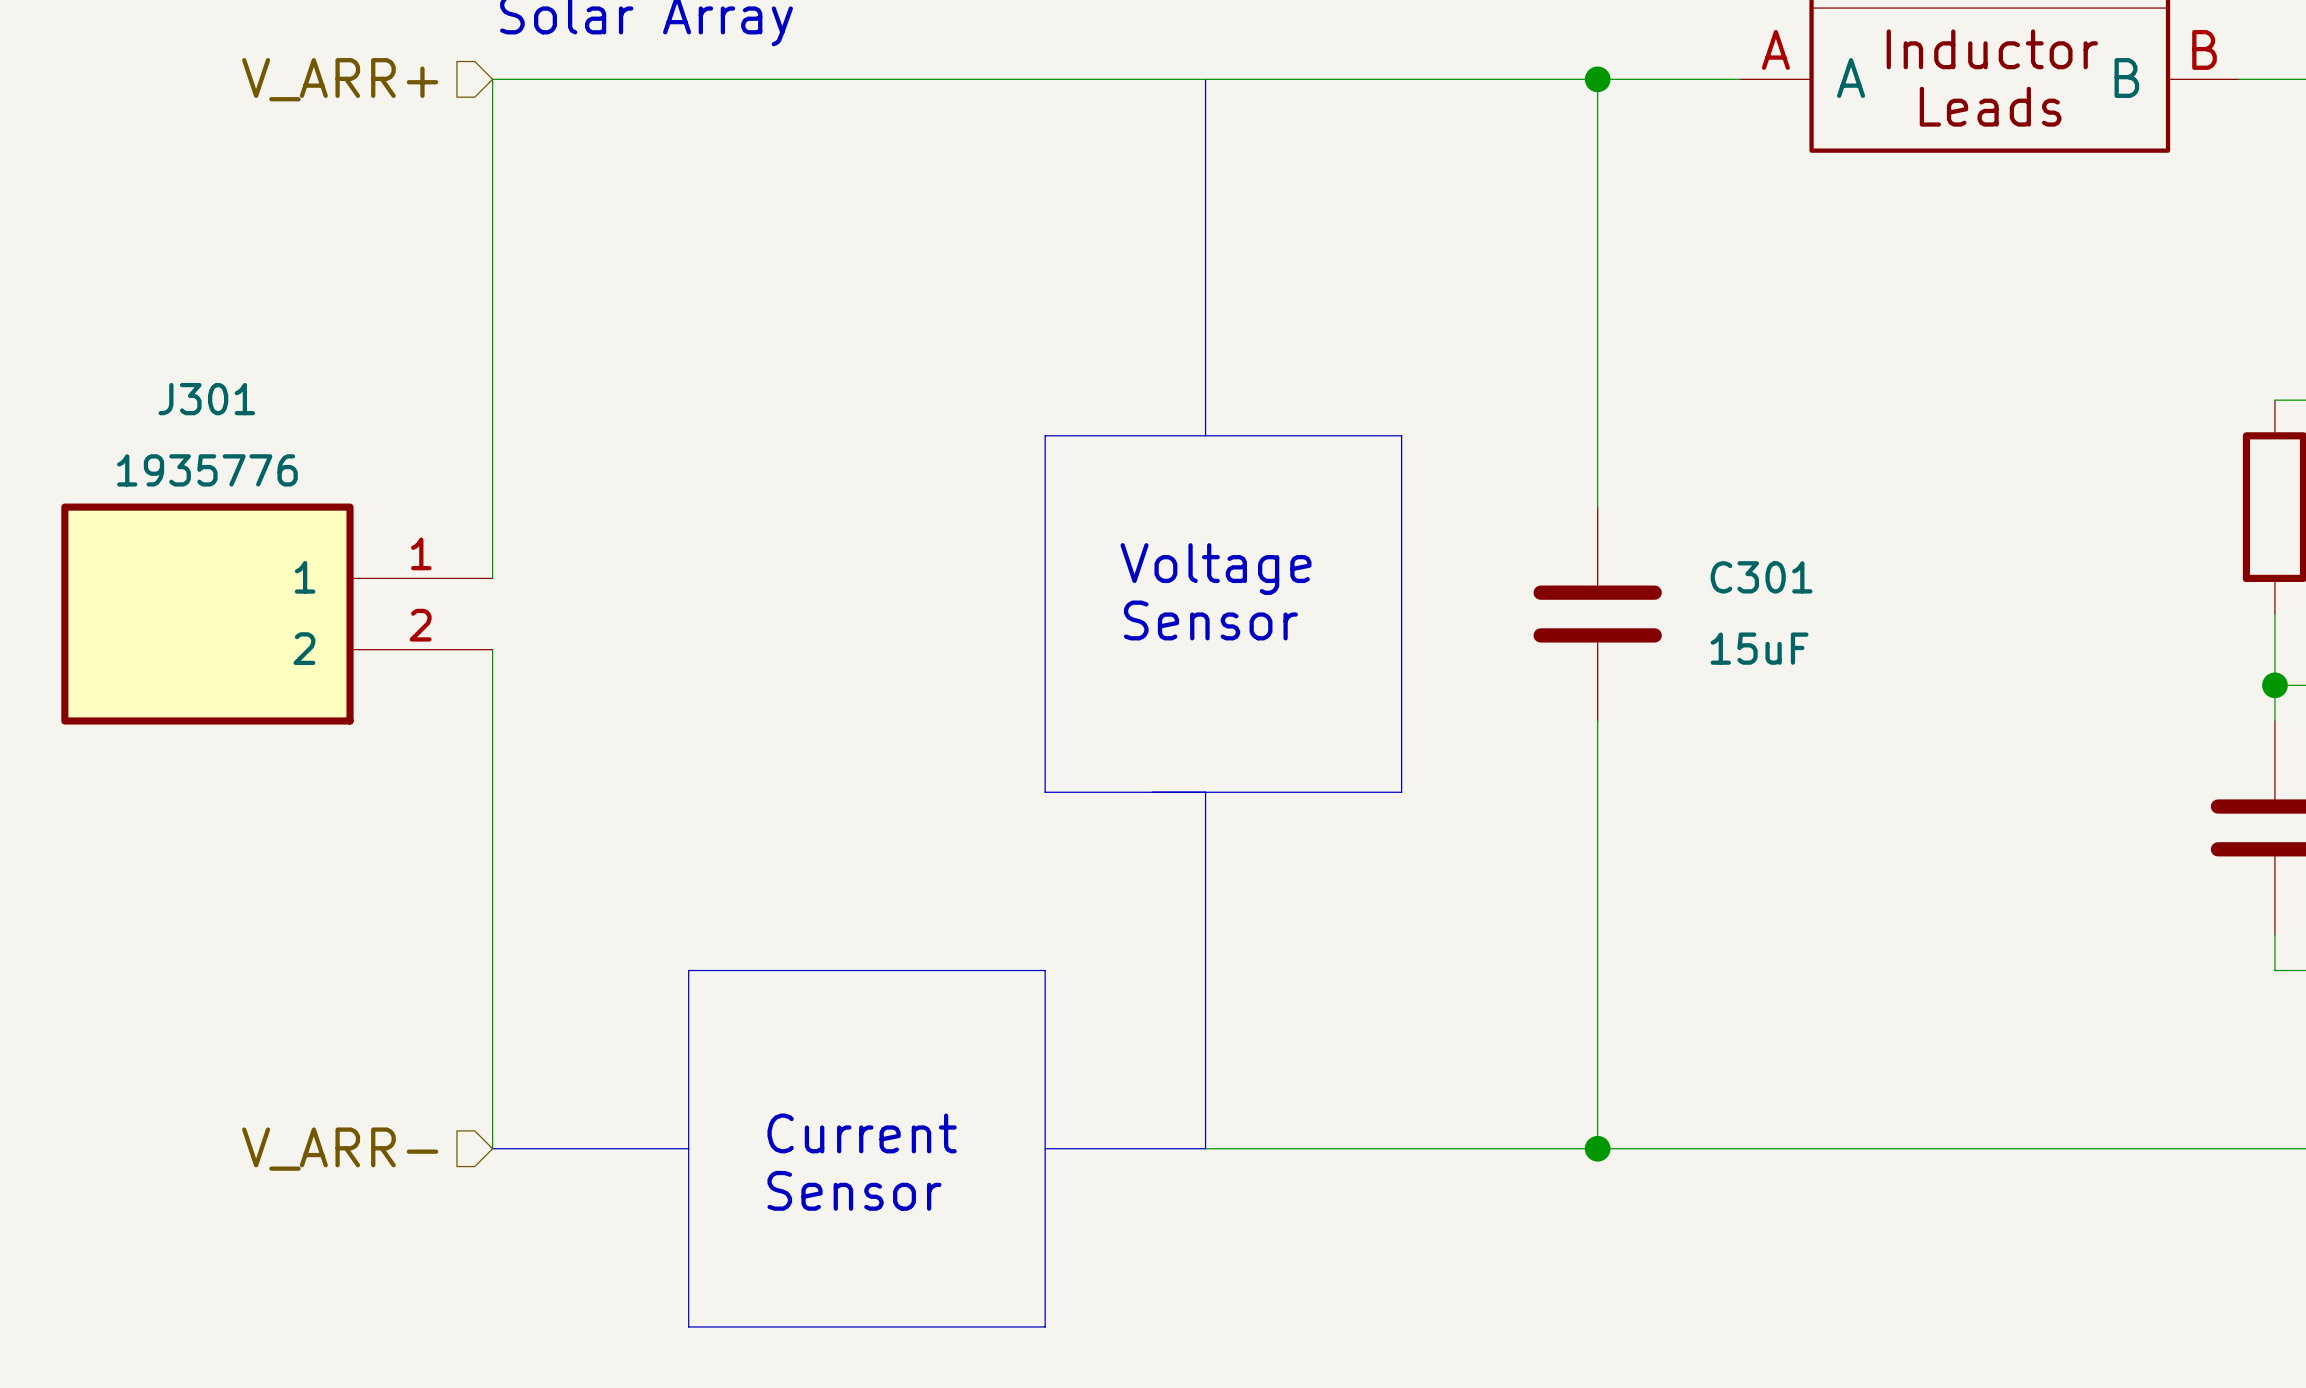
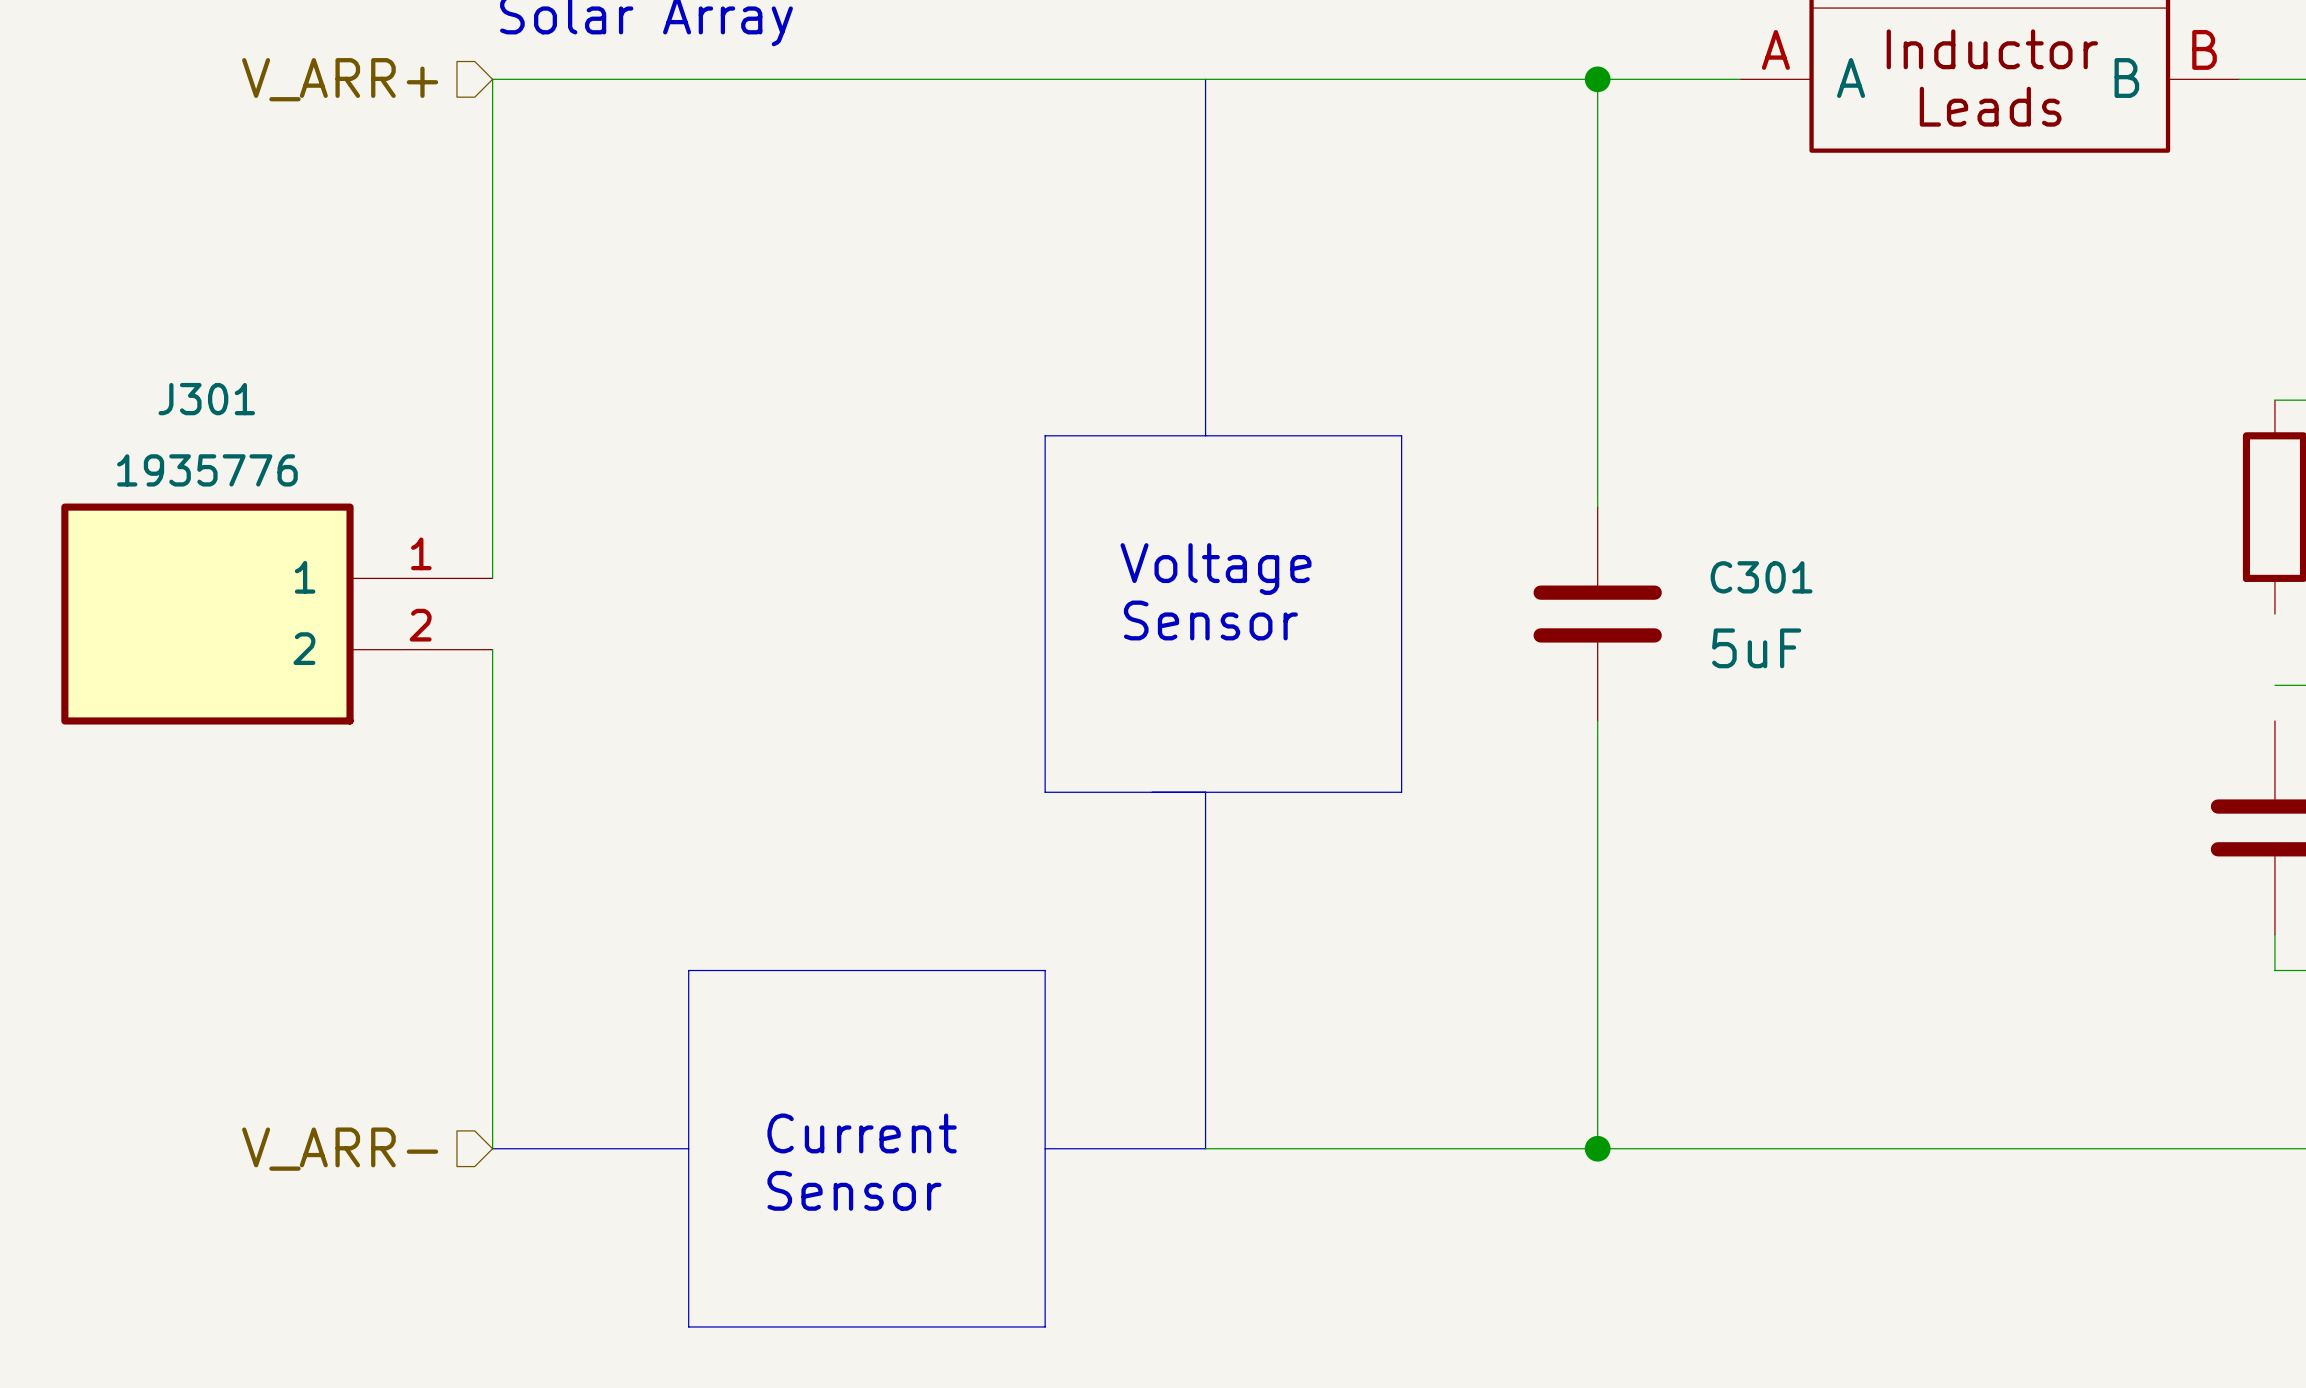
wire: (2274, 614) (2274, 720) -> none
C301 value: 15uF (1759, 648) -> 5uF (1756, 648)
junction: (2274, 685) -> none

